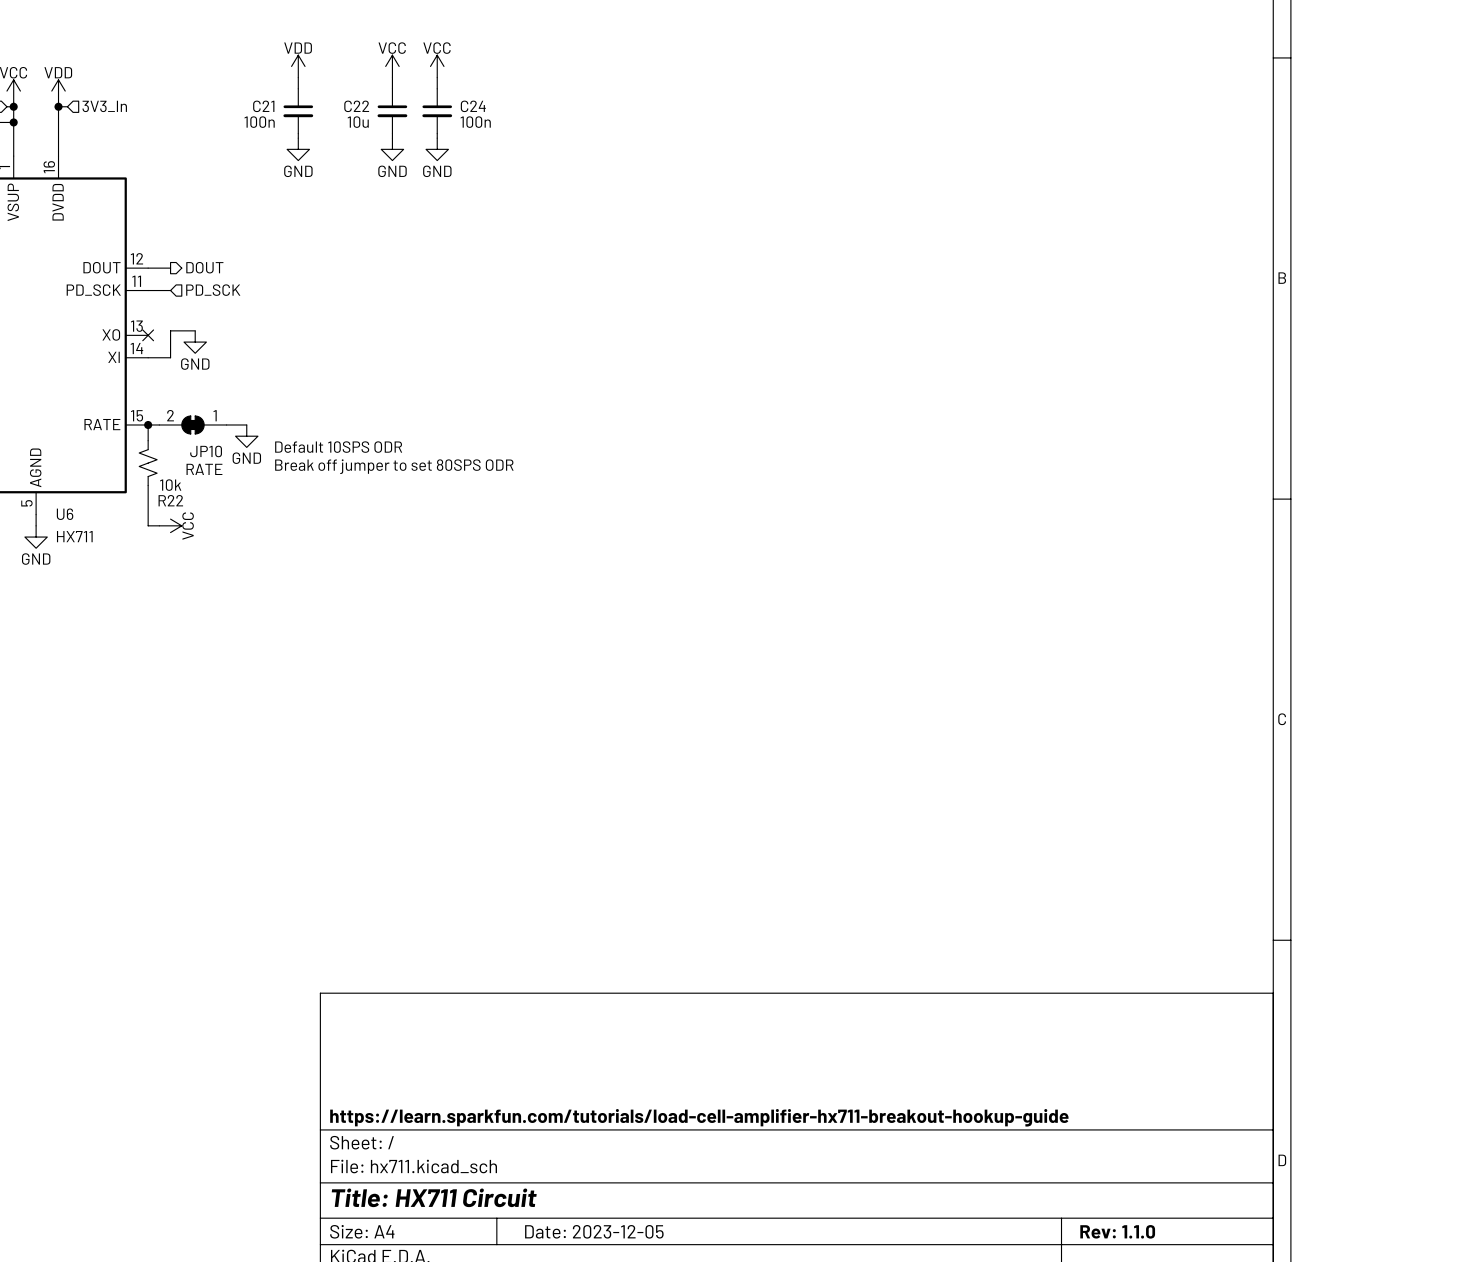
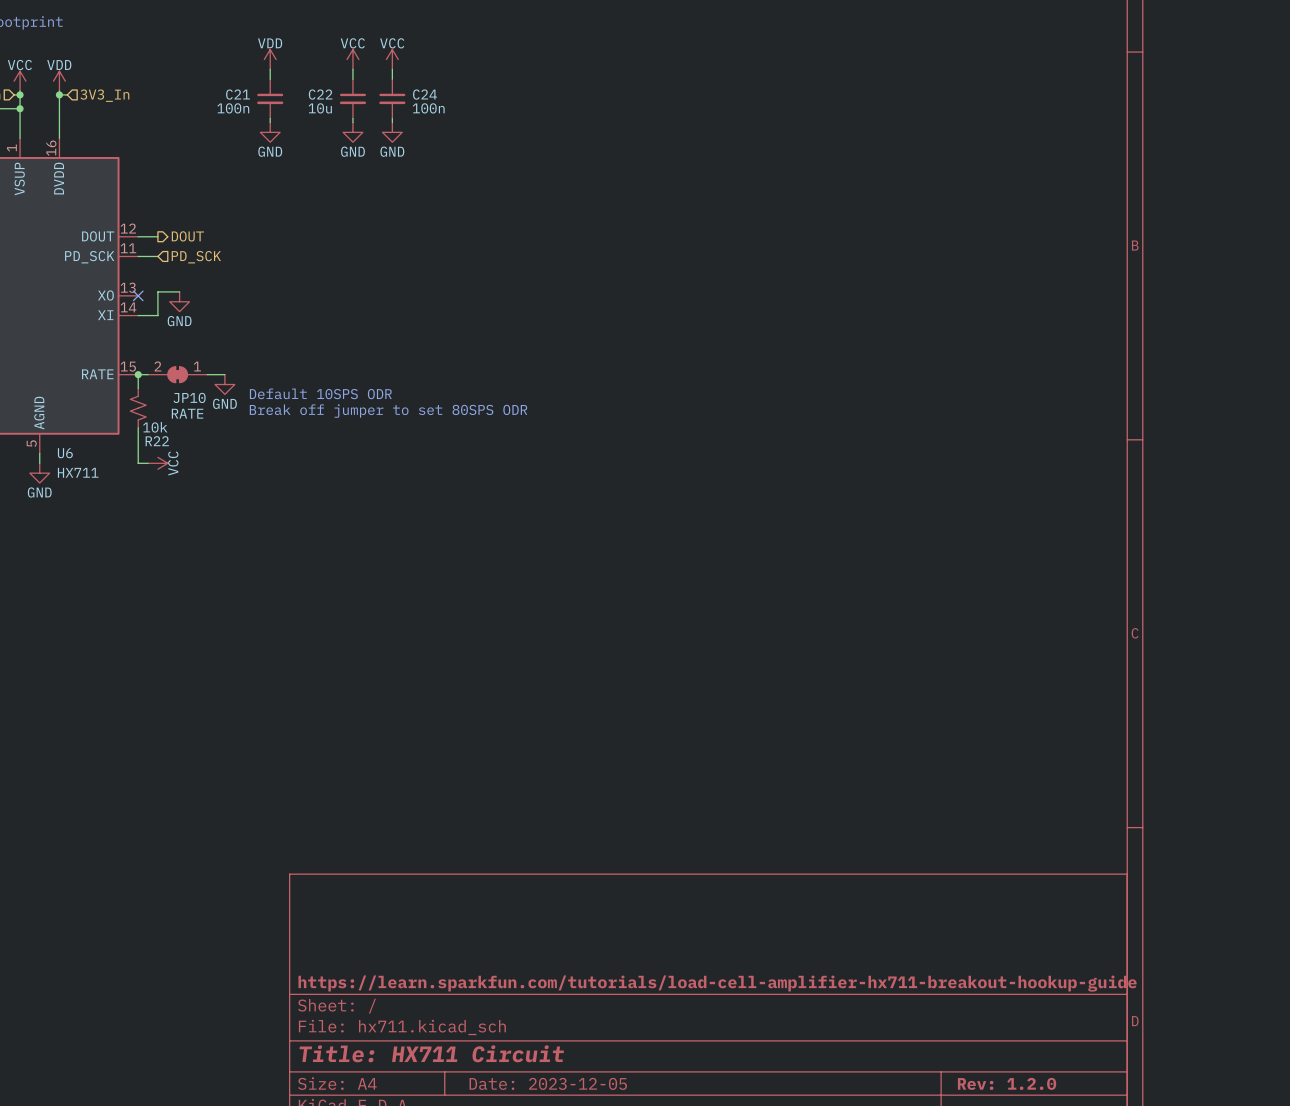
title block: Rev: 1.1.0 (1117, 1231) -> Rev: 1.2.0 (1007, 1083)

